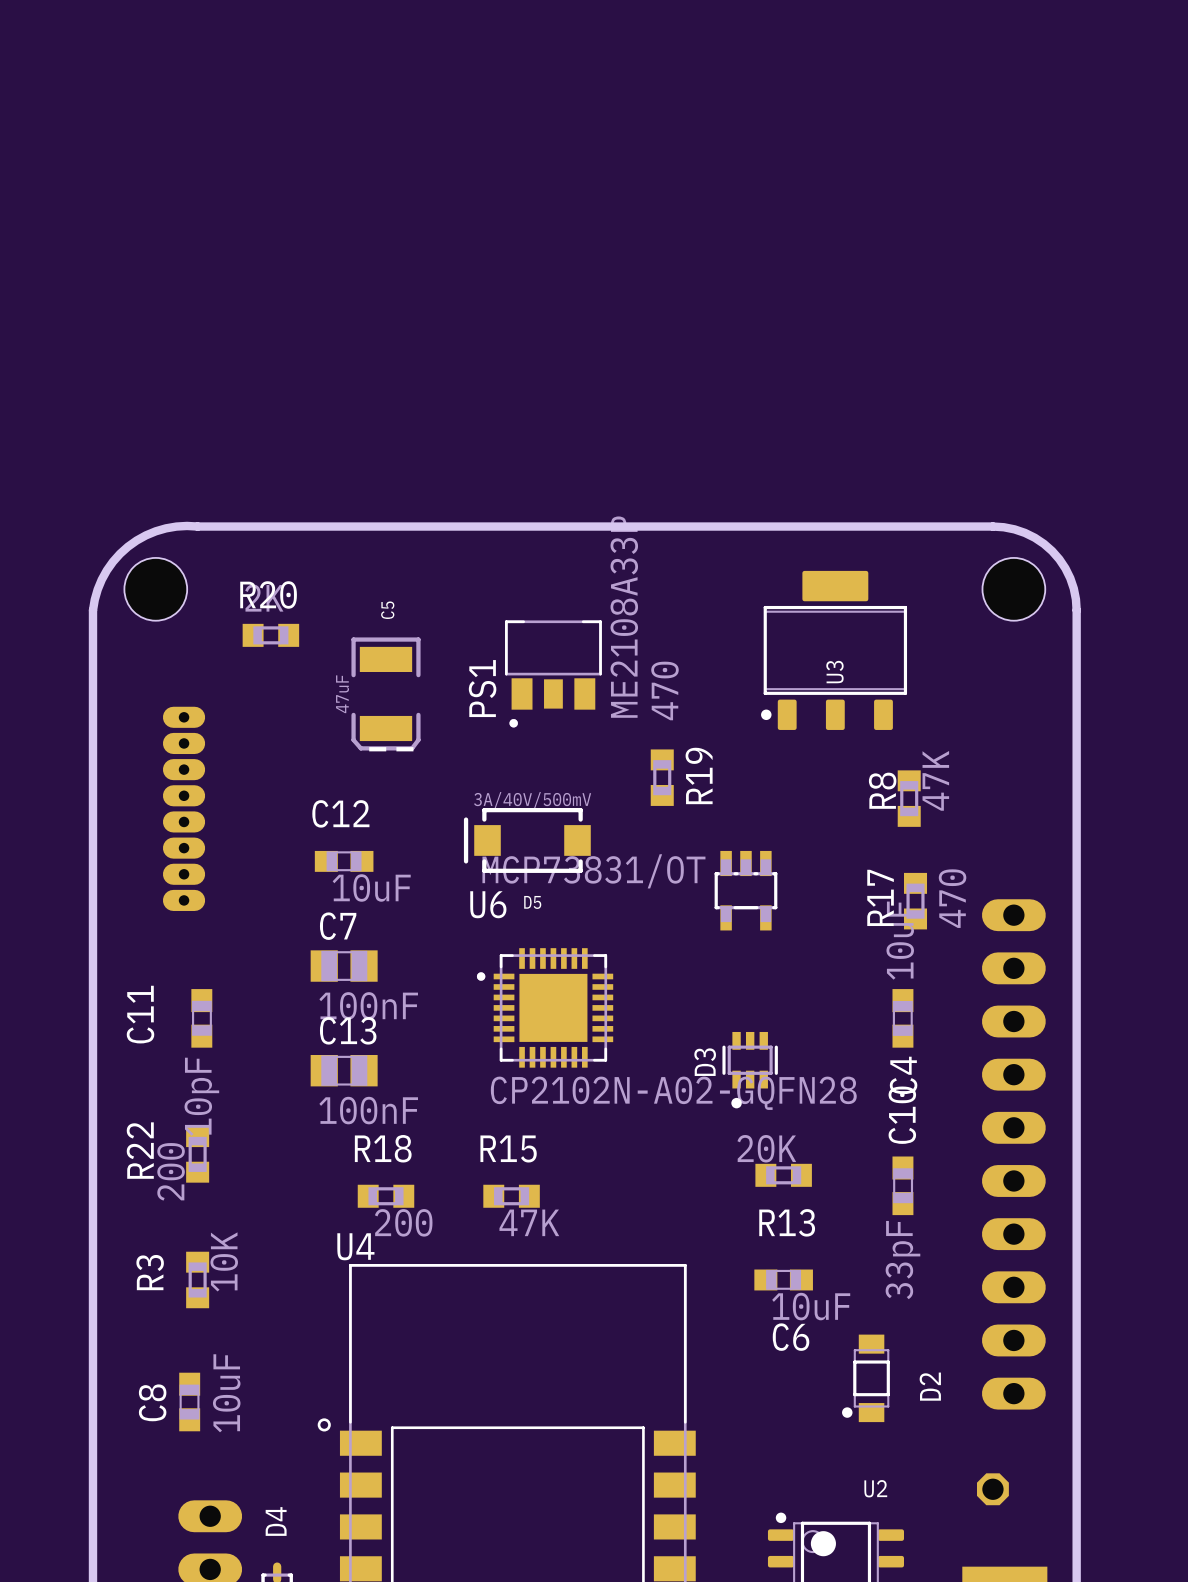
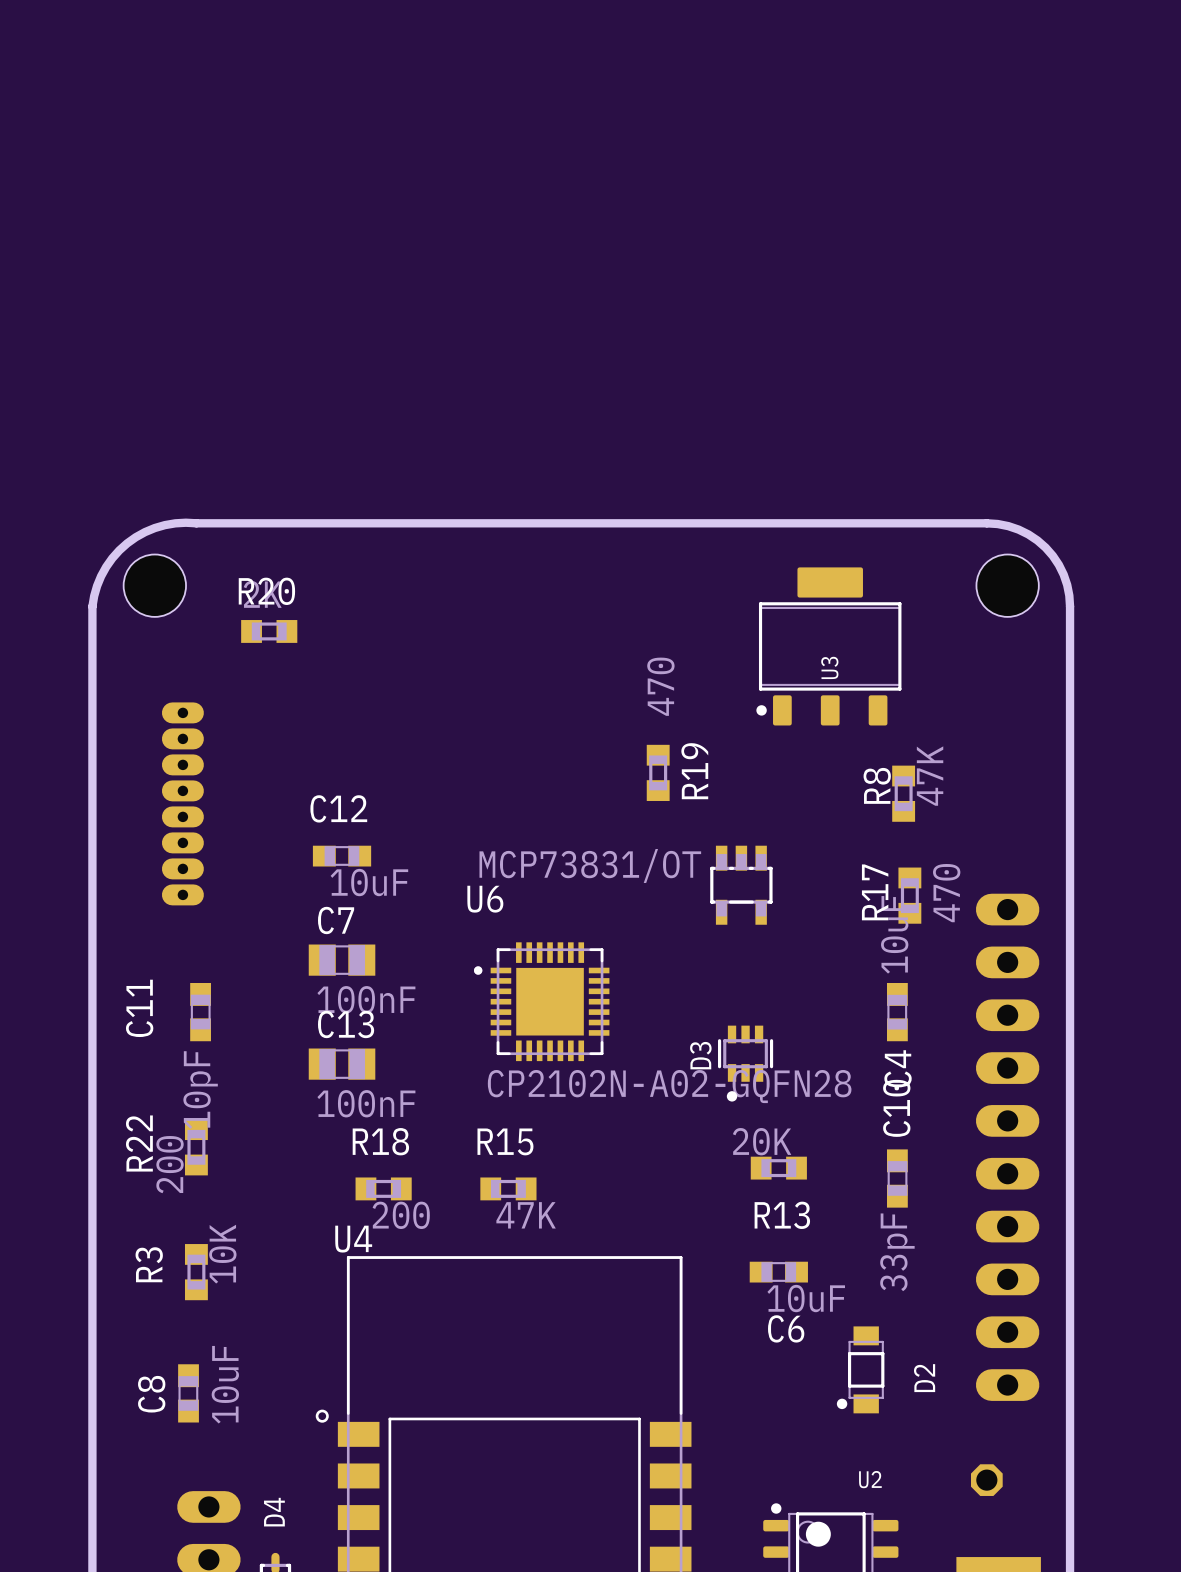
PS1: ME2108A33P (553, 673) -> none
C5: 47uF (386, 694) -> none
D5: 3A/40V/500mV (527, 840) -> none

